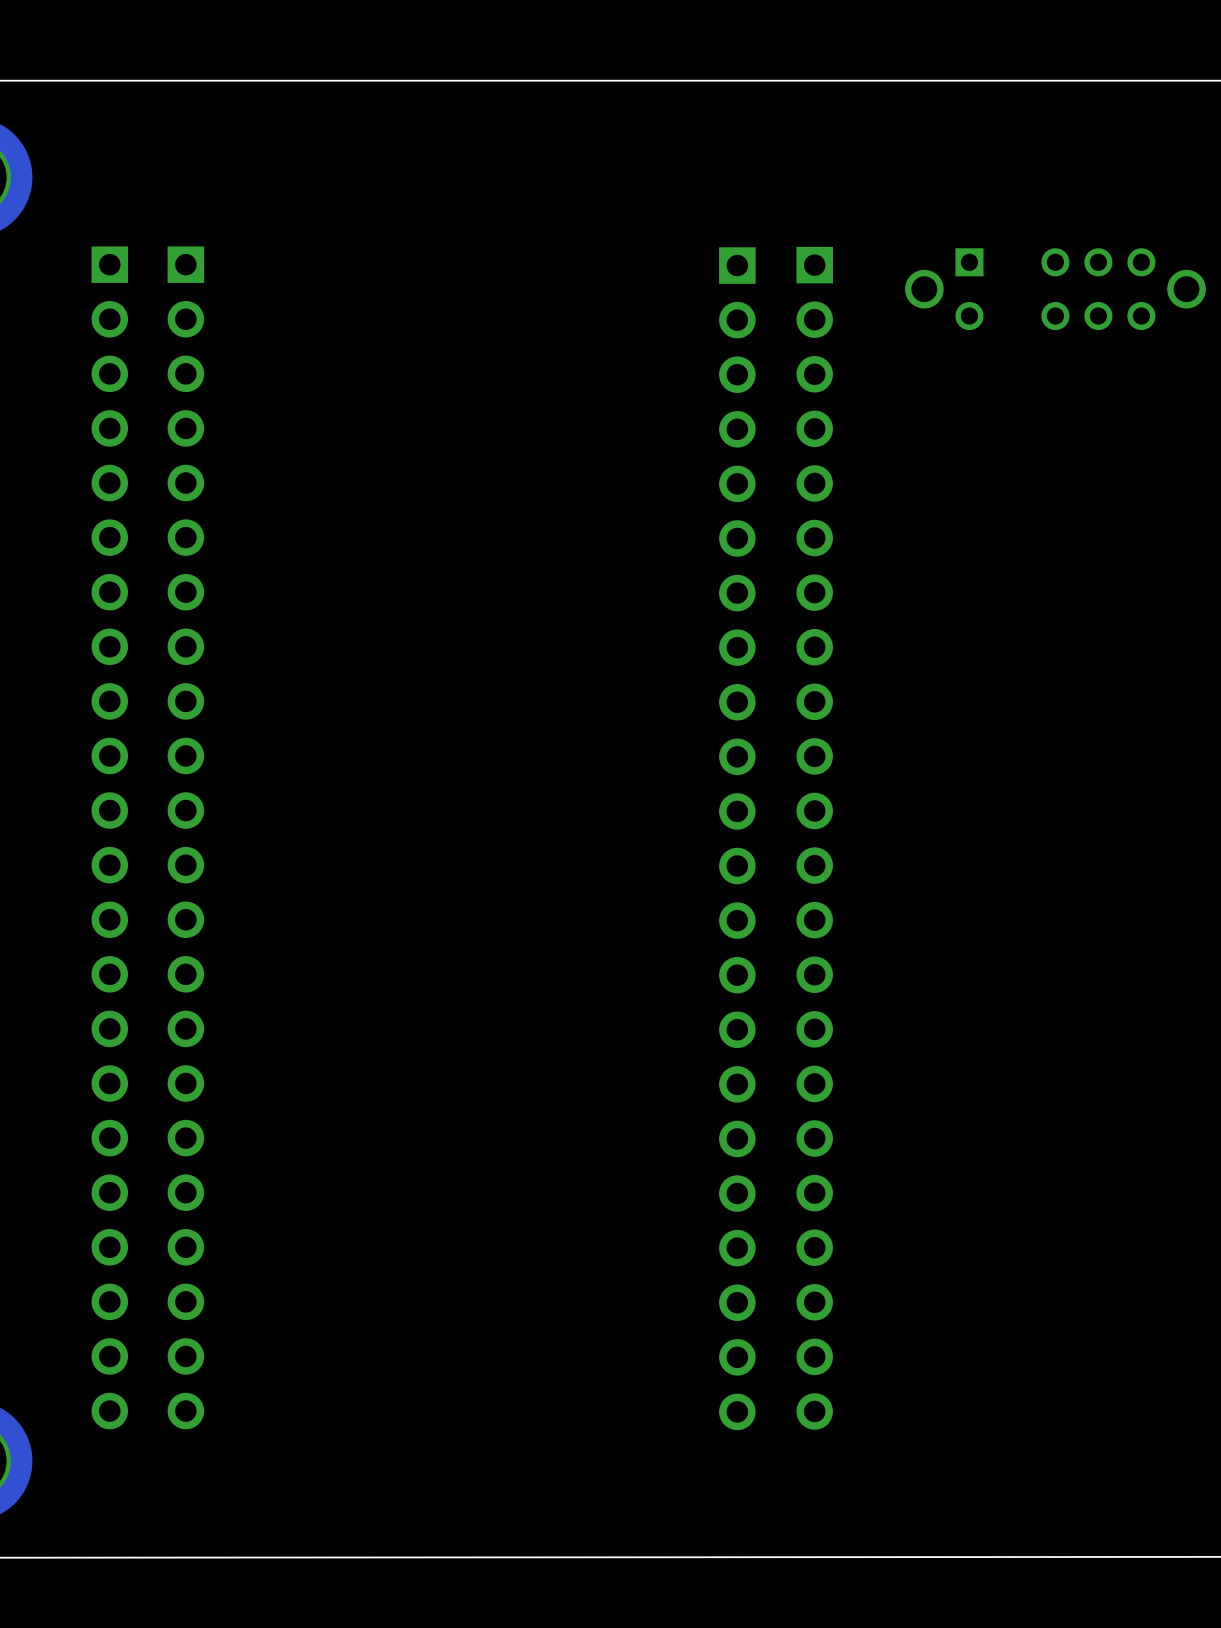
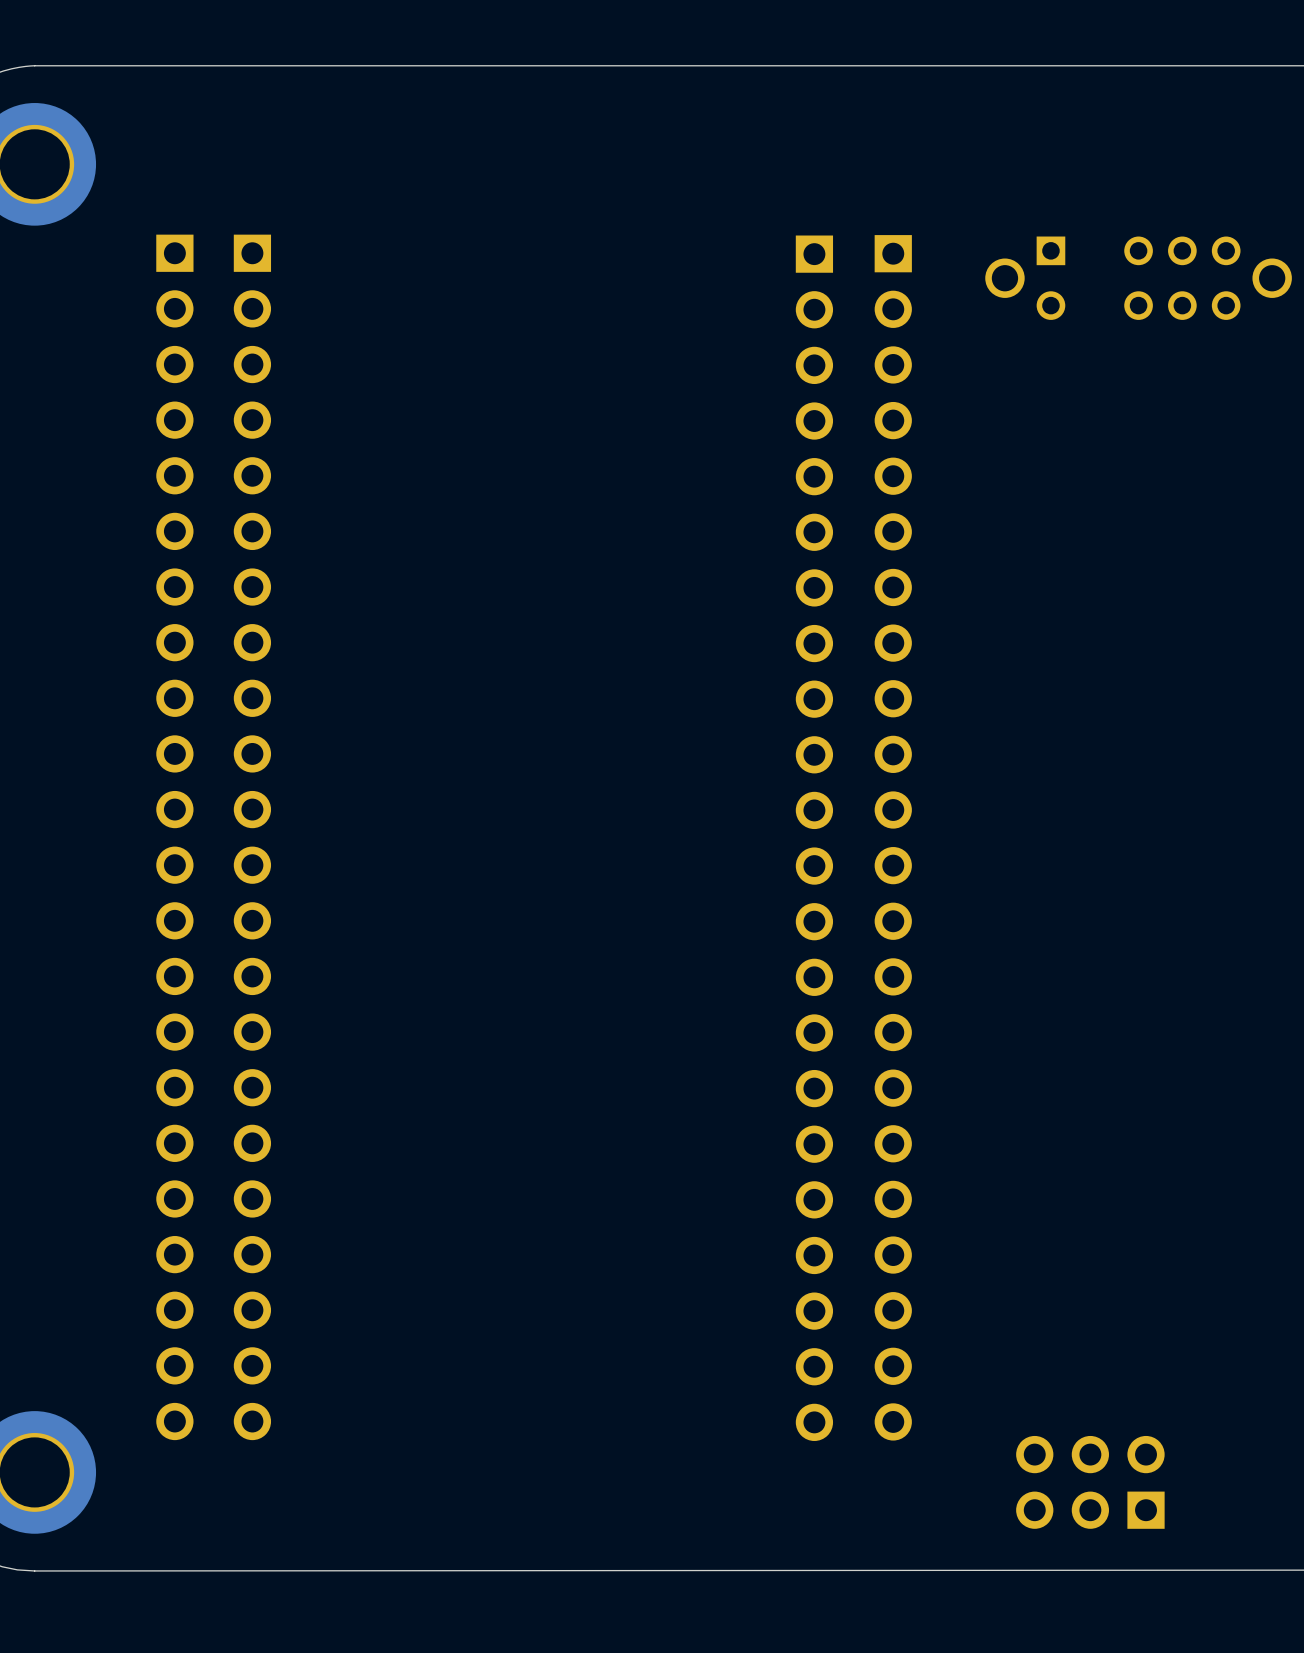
part: none -> (1090, 1482)

